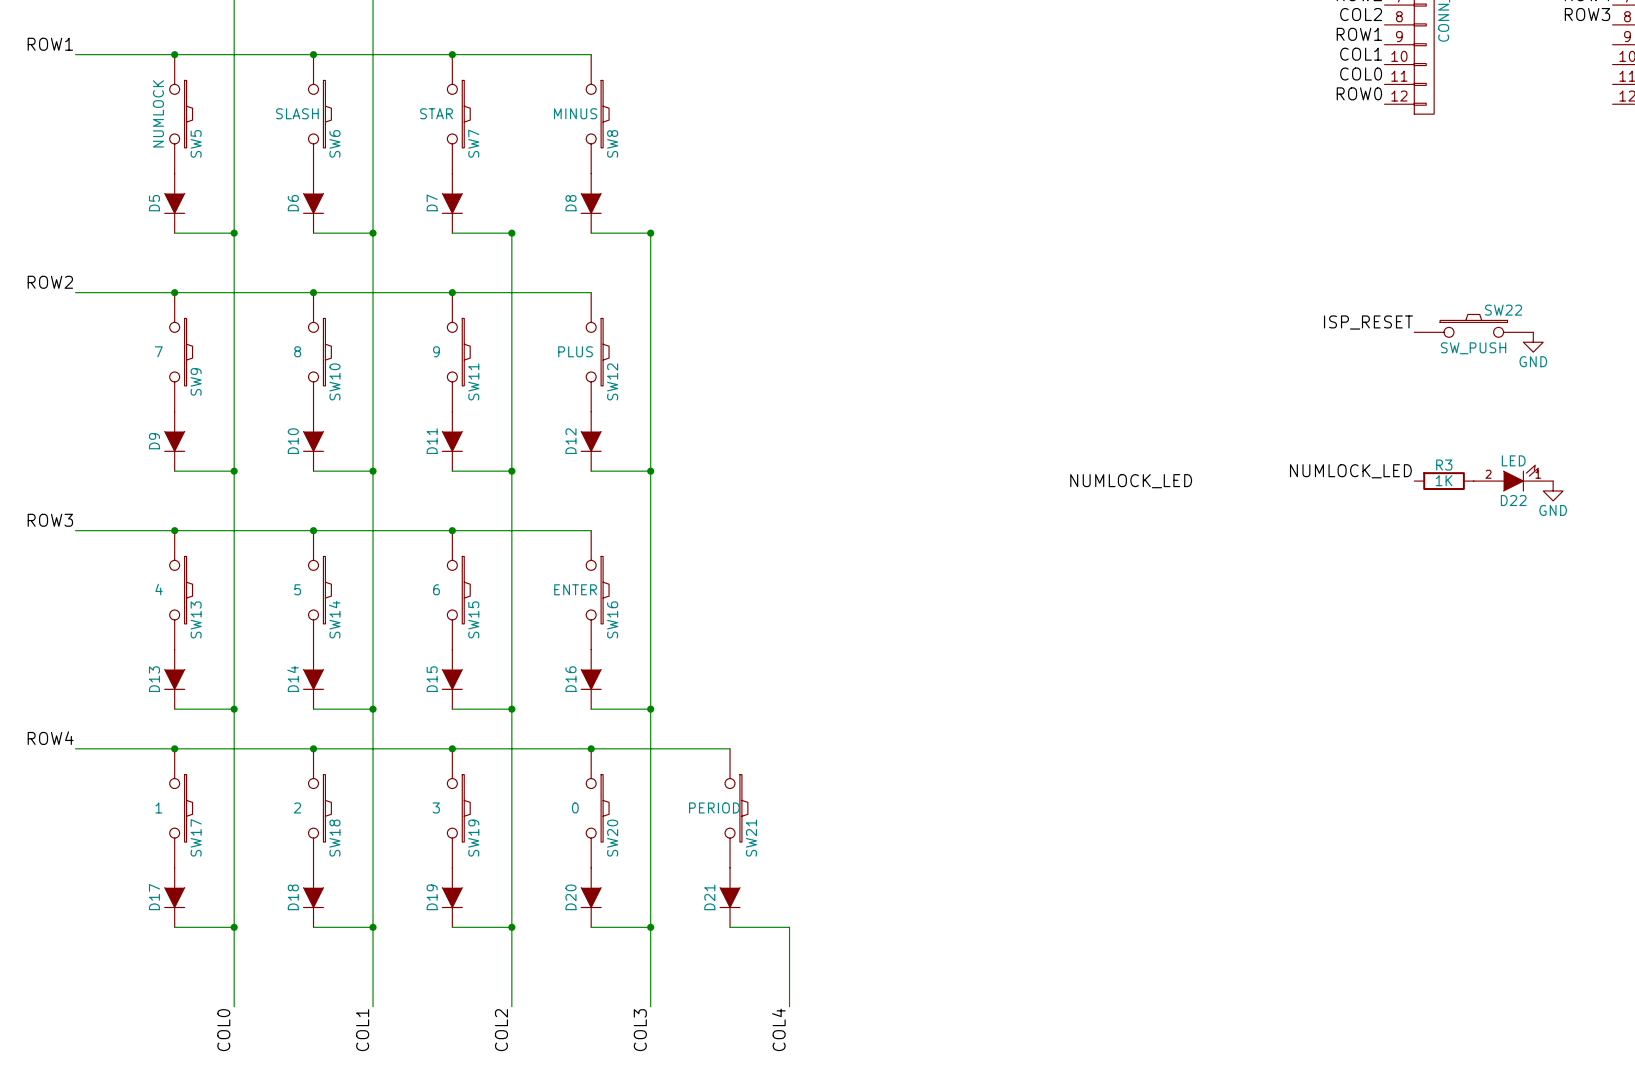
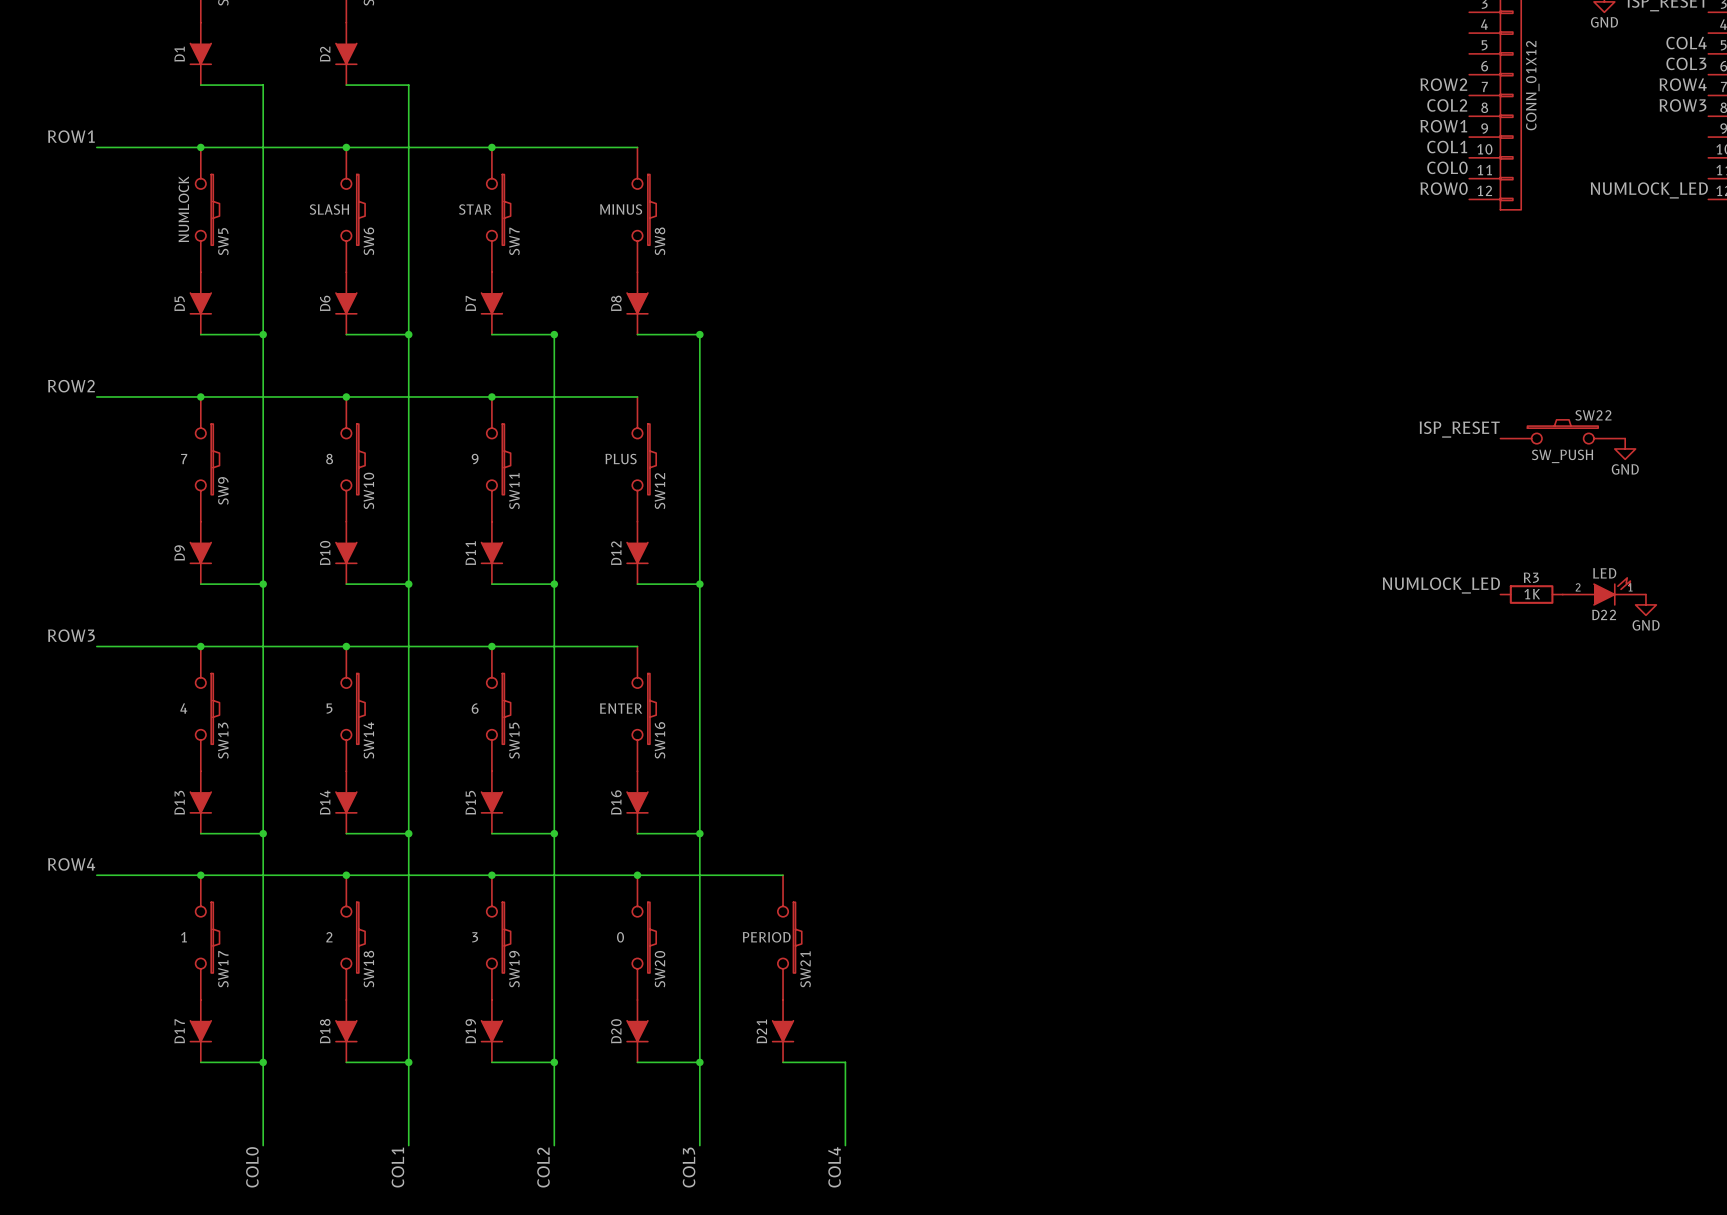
label: none -> NUMLOCK_LED (1649, 190)
label: NUMLOCK_LED (1131, 481) -> none

